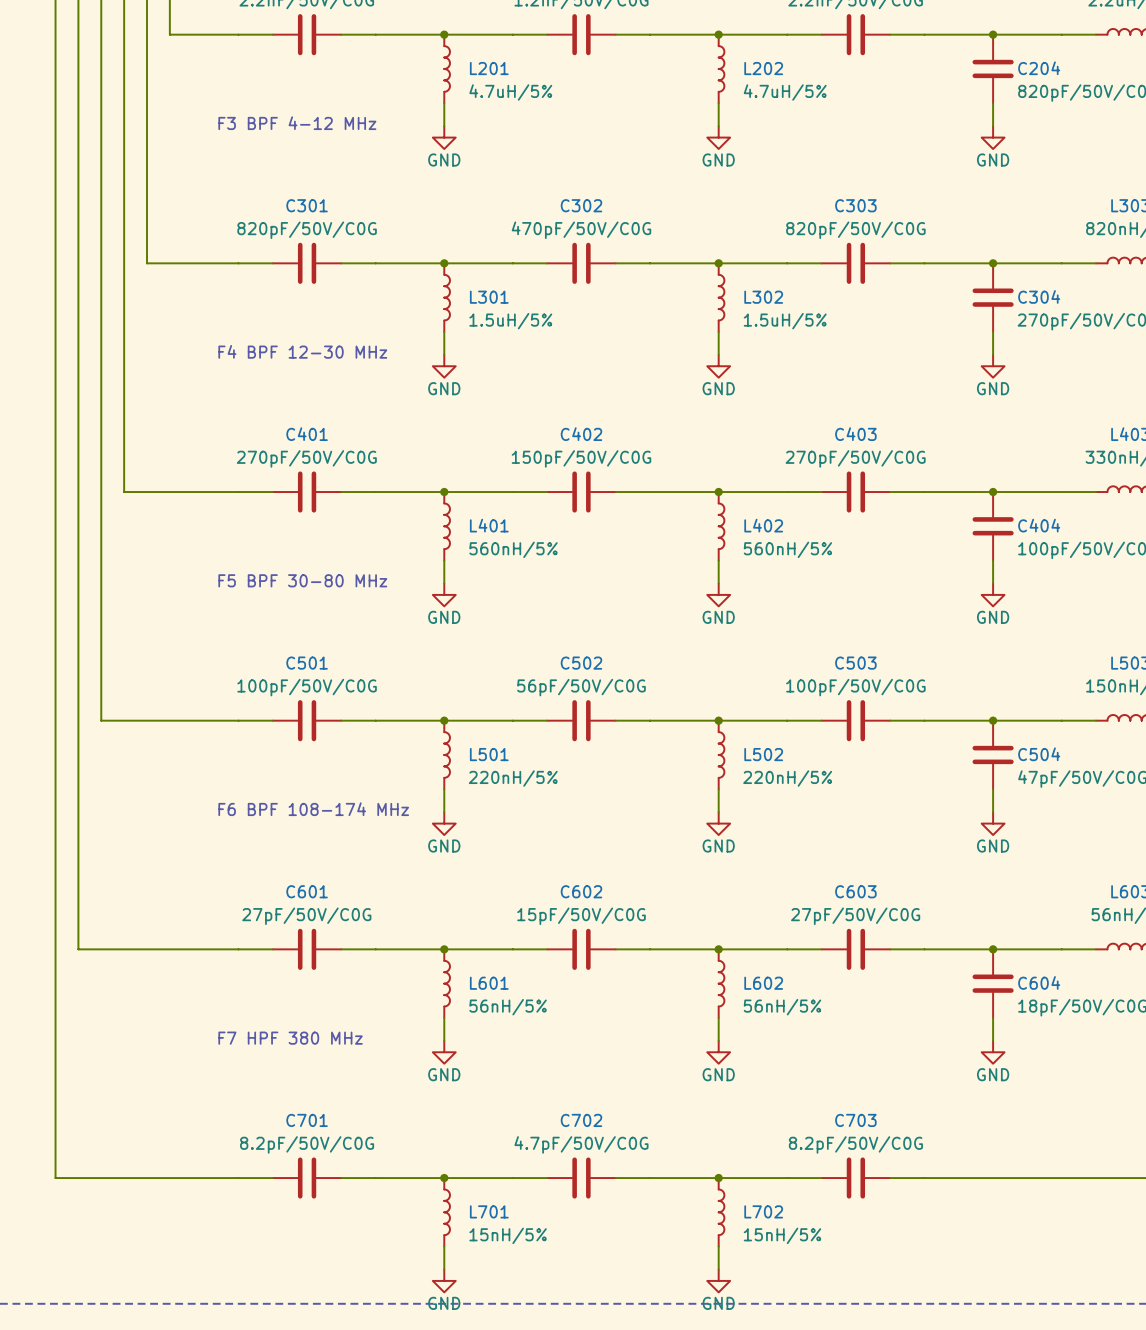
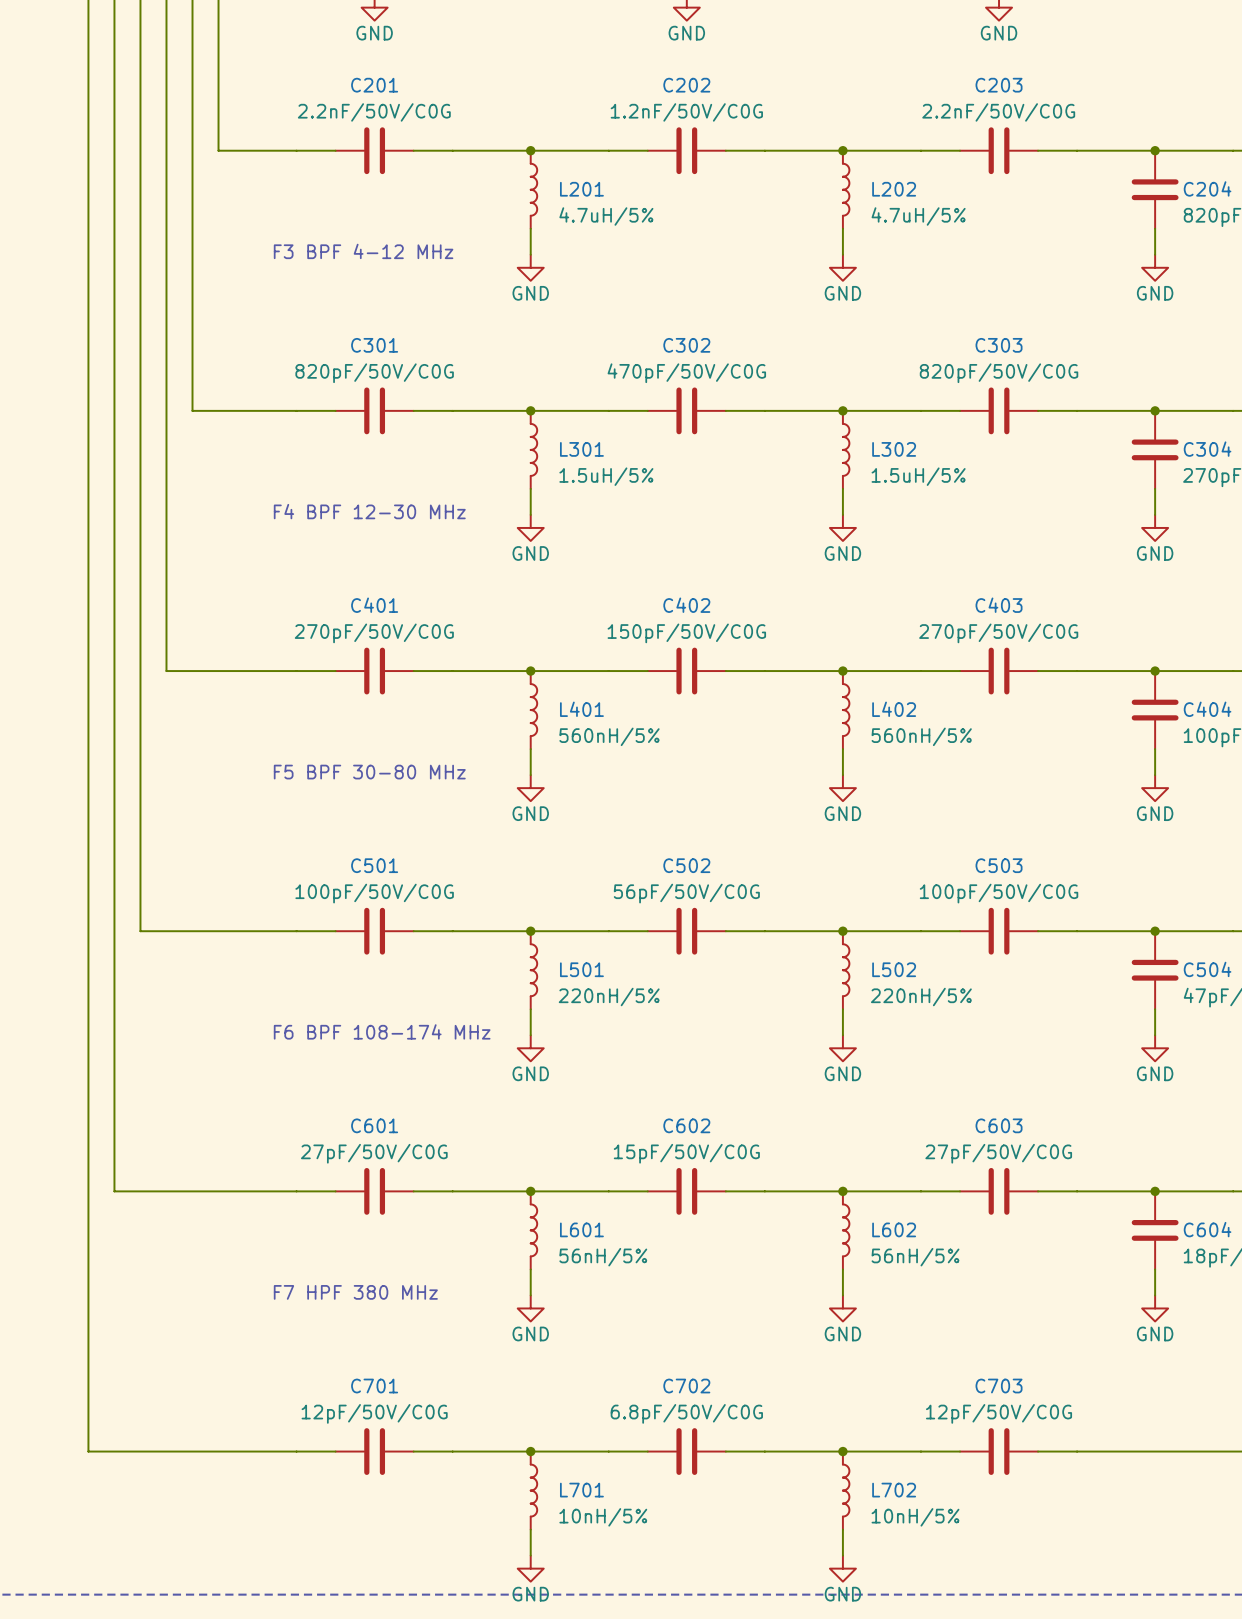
C701 value: 8.2pF/50V/C0G (307, 1144) -> 12pF/50V/C0G (374, 1413)
C702 value: 4.7pF/50V/C0G (581, 1144) -> 6.8pF/50V/C0G (686, 1413)
C703 value: 8.2pF/50V/C0G (855, 1144) -> 12pF/50V/C0G (999, 1413)
L701 value: 15nH/5% (508, 1235) -> 10nH/5% (603, 1517)
L702 value: 15nH/5% (782, 1235) -> 10nH/5% (915, 1517)

